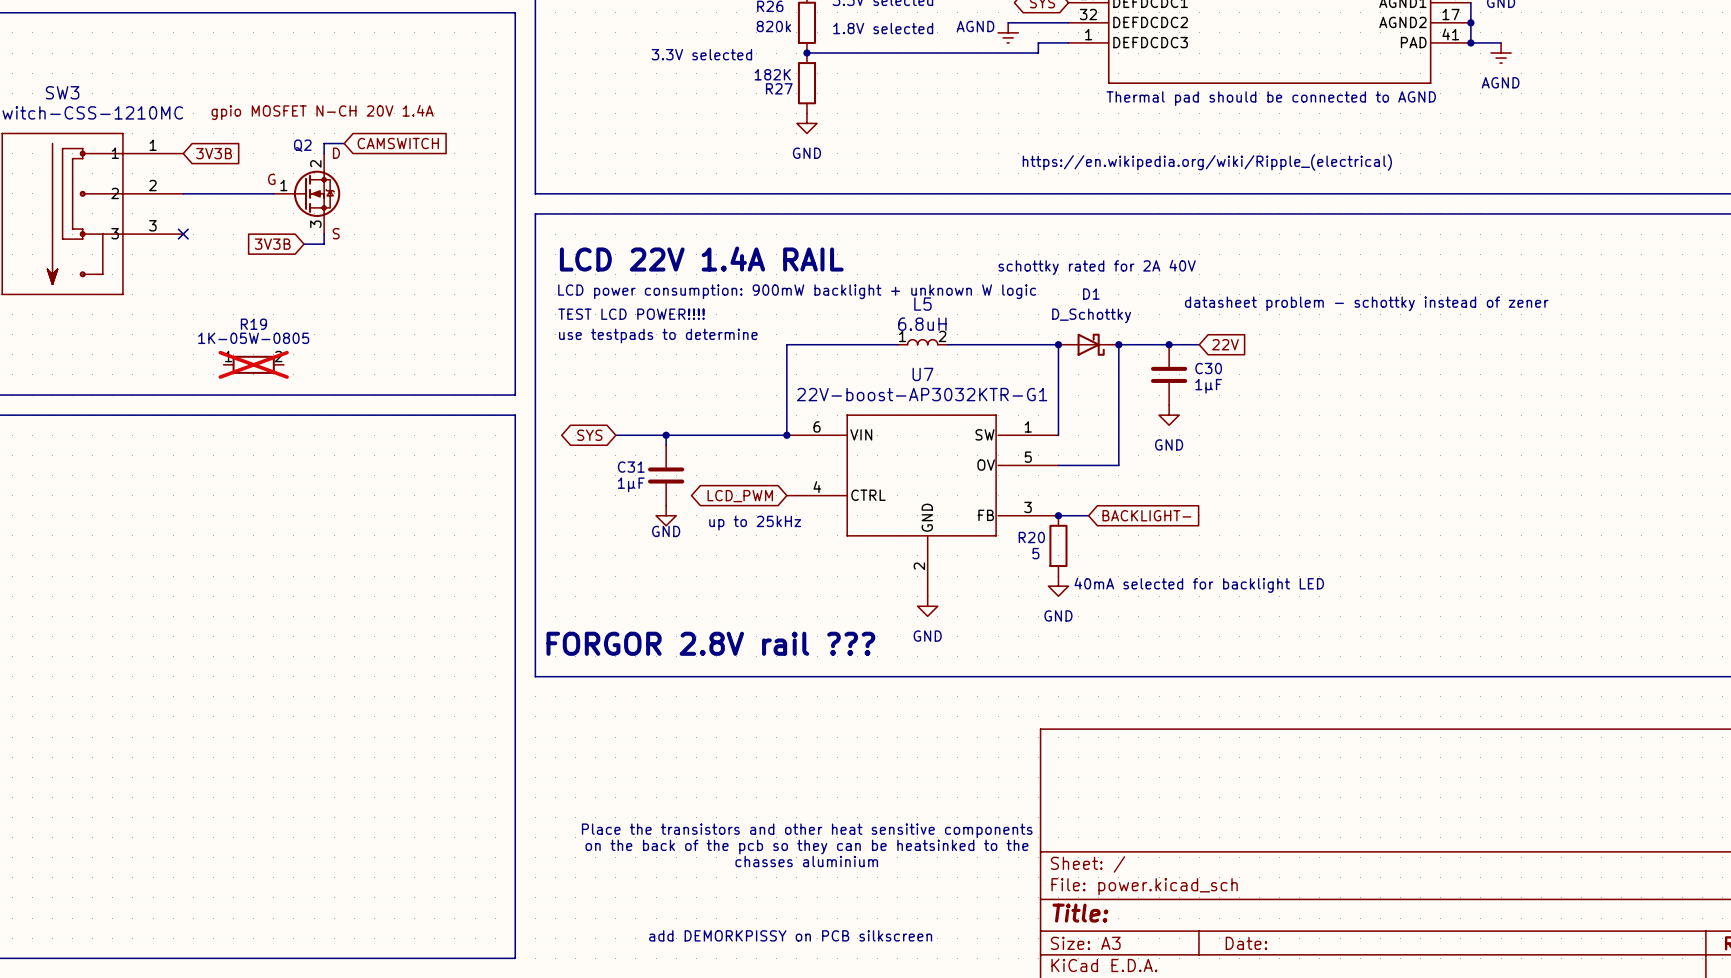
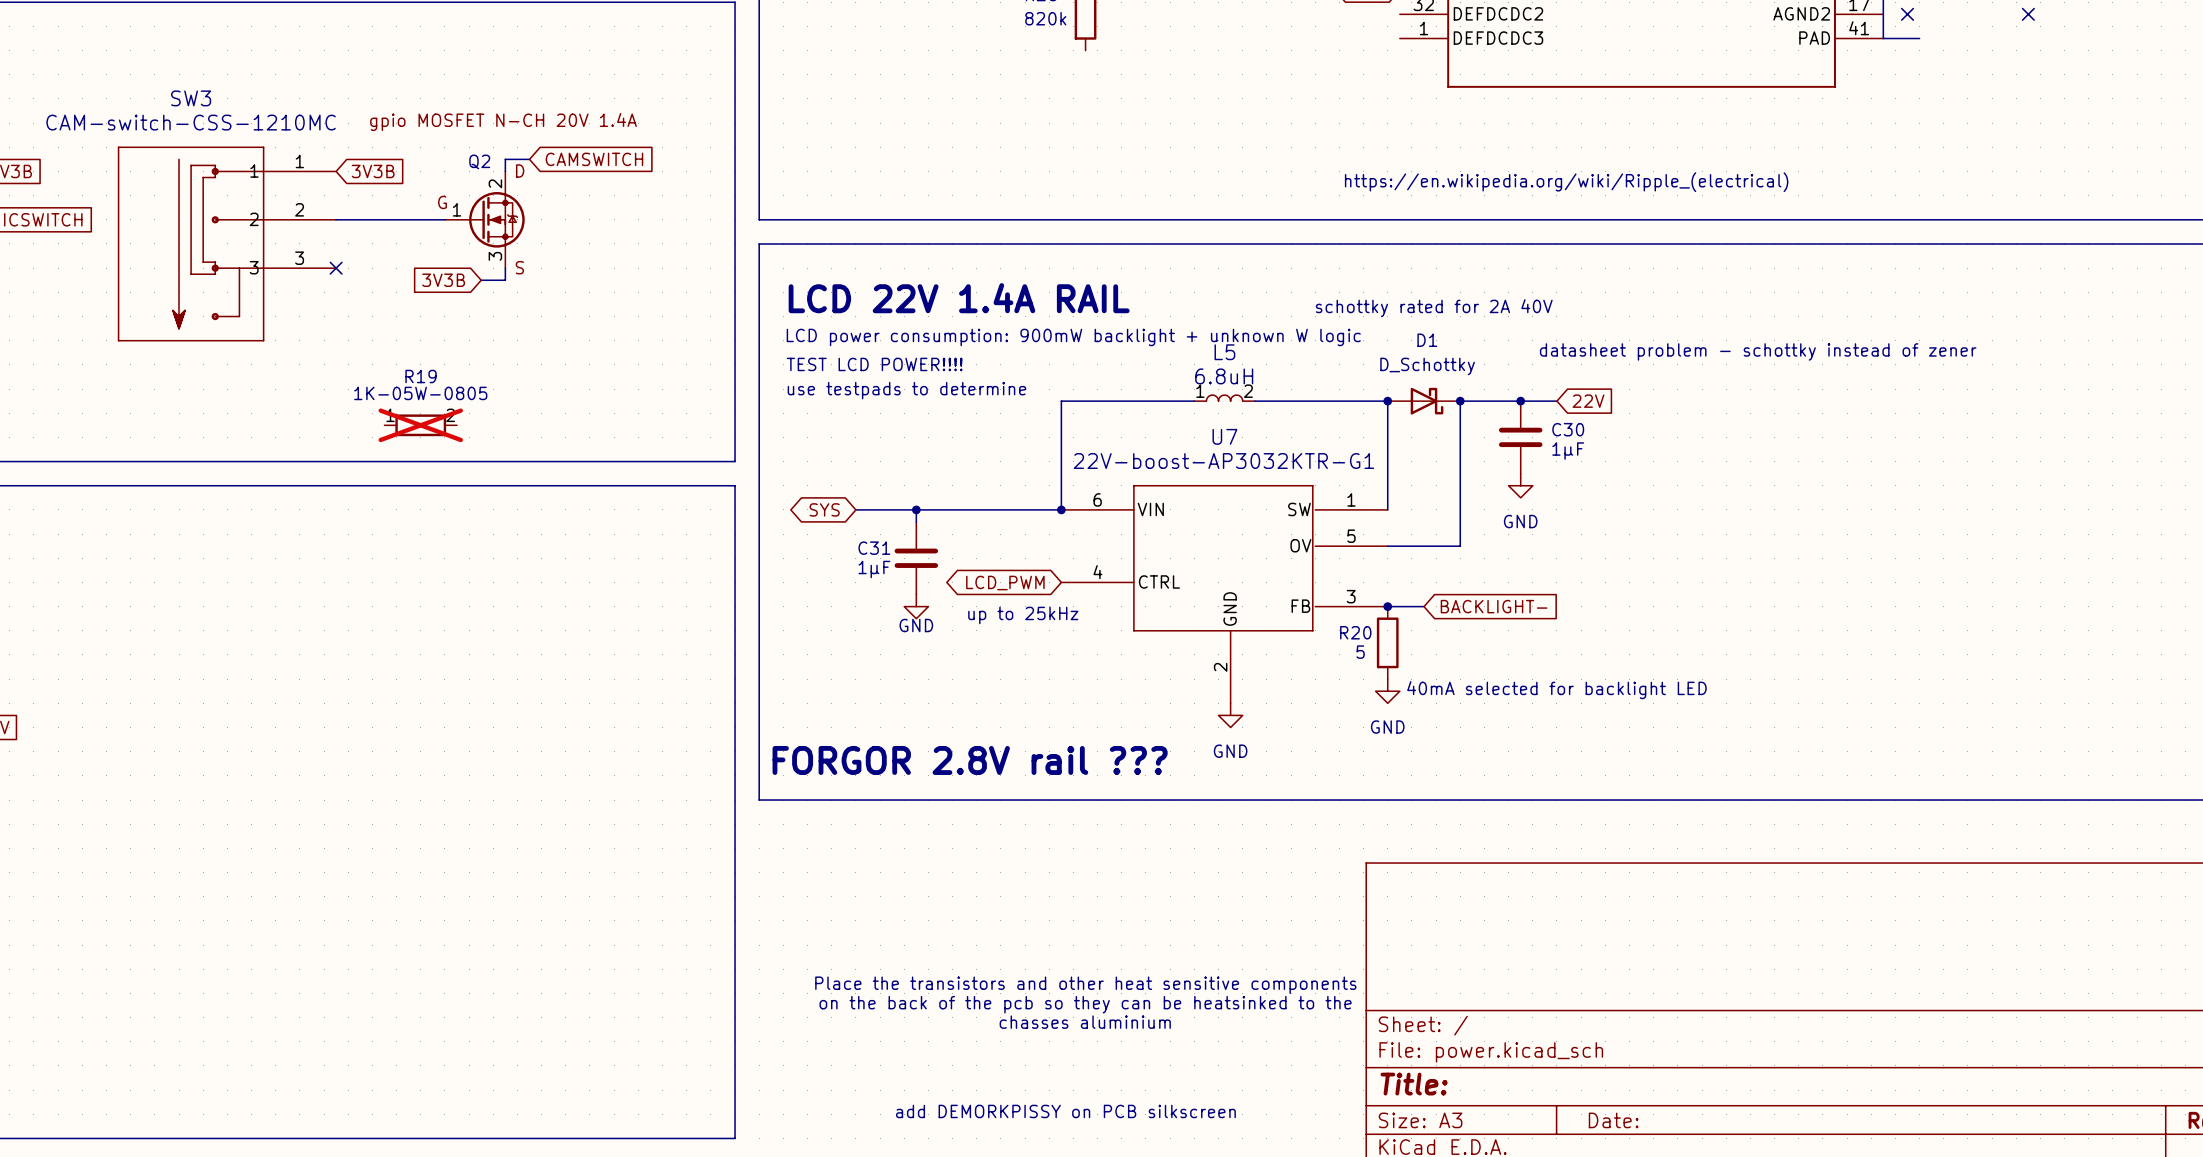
wire: (1008, 22) (1068, 22) -> none
junction: (1470, 22) -> none
no-connect mark: none -> (1907, 14)
no-connect mark: none -> (2028, 14)
text: 1.8V selected (883, 28) -> none
power symbol: AGND (1008, 32) -> none
wire: (1068, 42) (1038, 42) (1038, 53) (806, 53) -> none
junction: (1470, 42) -> none
junction: (806, 53) -> none
power symbol: AGND (1501, 53) -> none
text: 3.3V selected (701, 54) -> none
R27: 182K (806, 83) -> none
text: Thermal pad should be connected to AGND (1271, 98) -> none
power symbol: GND (806, 123) -> none

